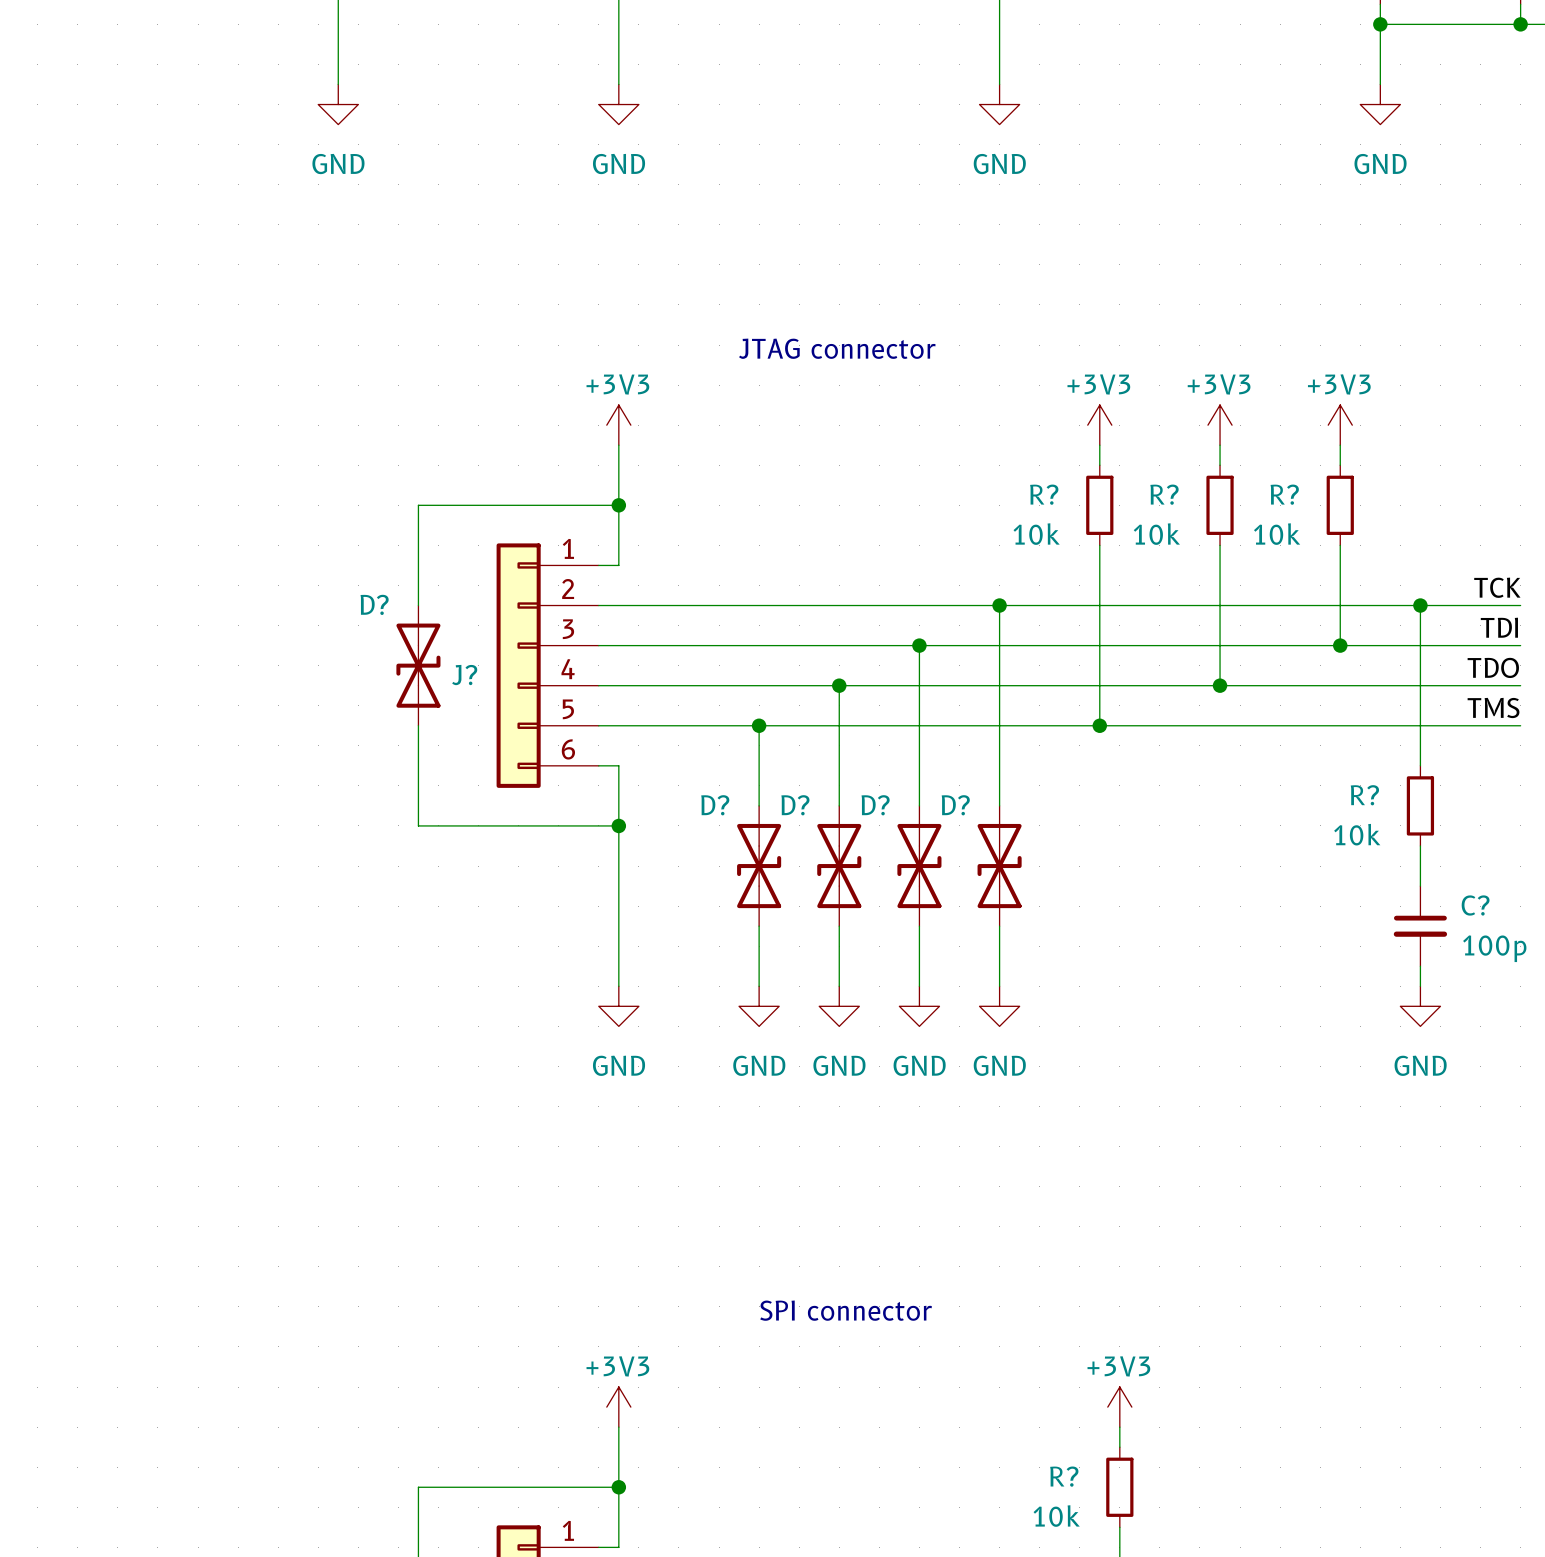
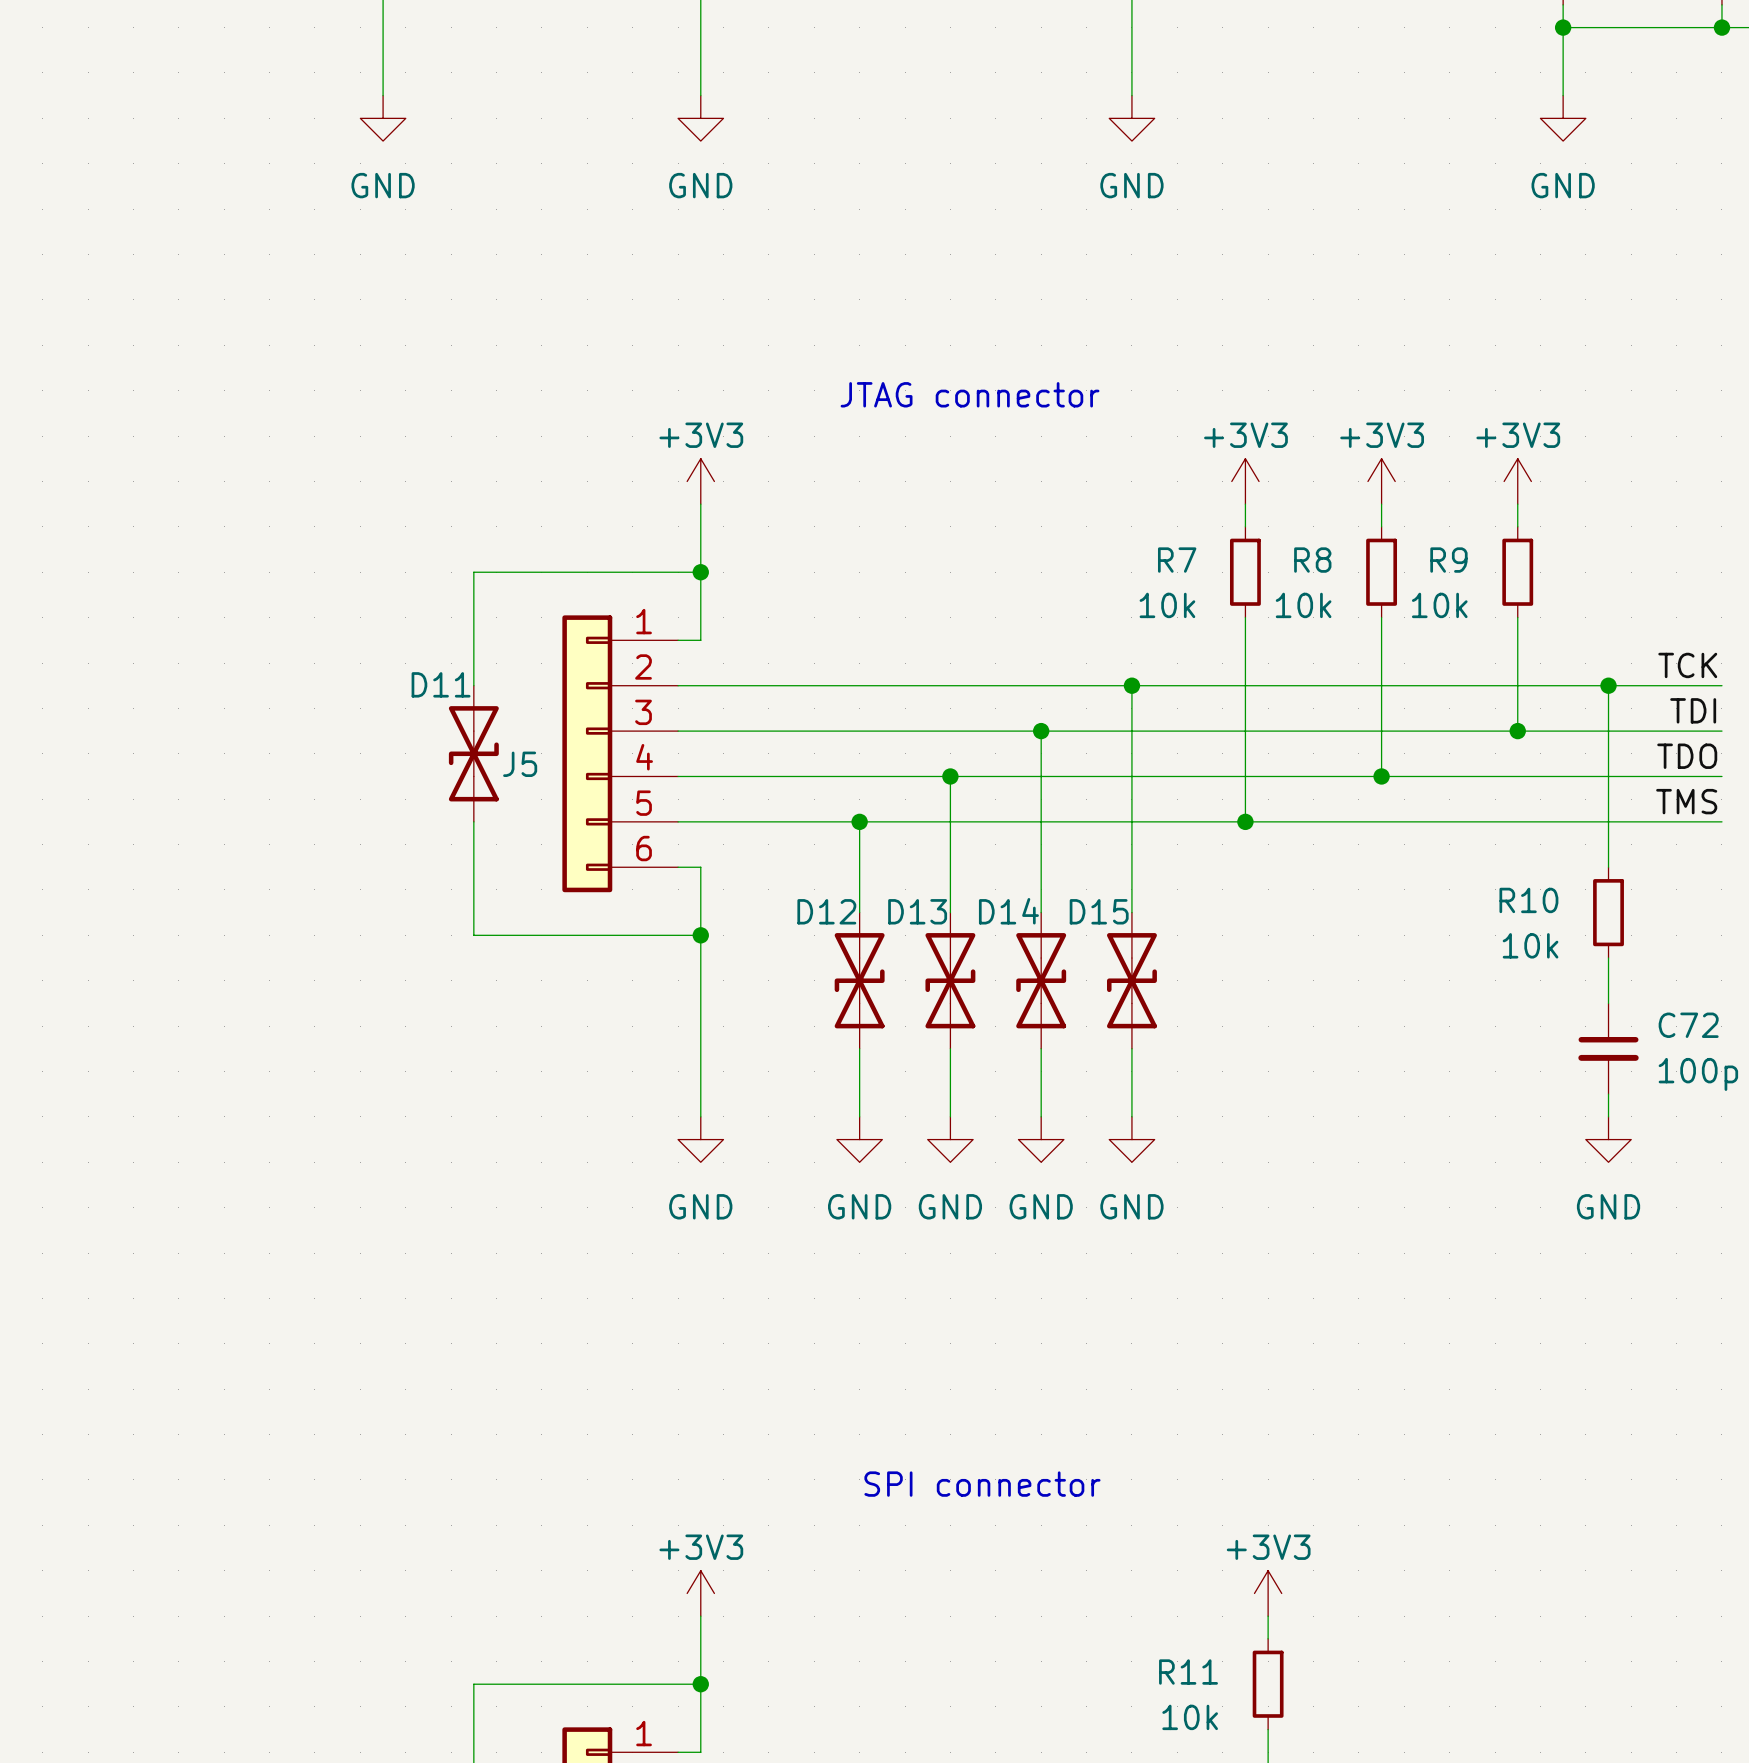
R? name: R? (1044, 494) -> R7 (1177, 560)
R? name: R? (1164, 494) -> R8 (1312, 560)
R? name: R? (1284, 494) -> R9 (1448, 560)
D? name: D? (374, 604) -> D11 (441, 684)
J? name: J? (464, 675) -> J5 (520, 764)
R? name: R? (1364, 795) -> R10 (1528, 900)
D? name: D? (715, 805) -> D12 (826, 911)
D? name: D? (795, 805) -> D13 (917, 911)
D? name: D? (875, 805) -> D14 (1008, 911)
D? name: D? (955, 805) -> D15 (1099, 911)
C? name: C? (1475, 905) -> C72 (1688, 1025)
R? name: R? (1064, 1476) -> R11 (1188, 1672)

